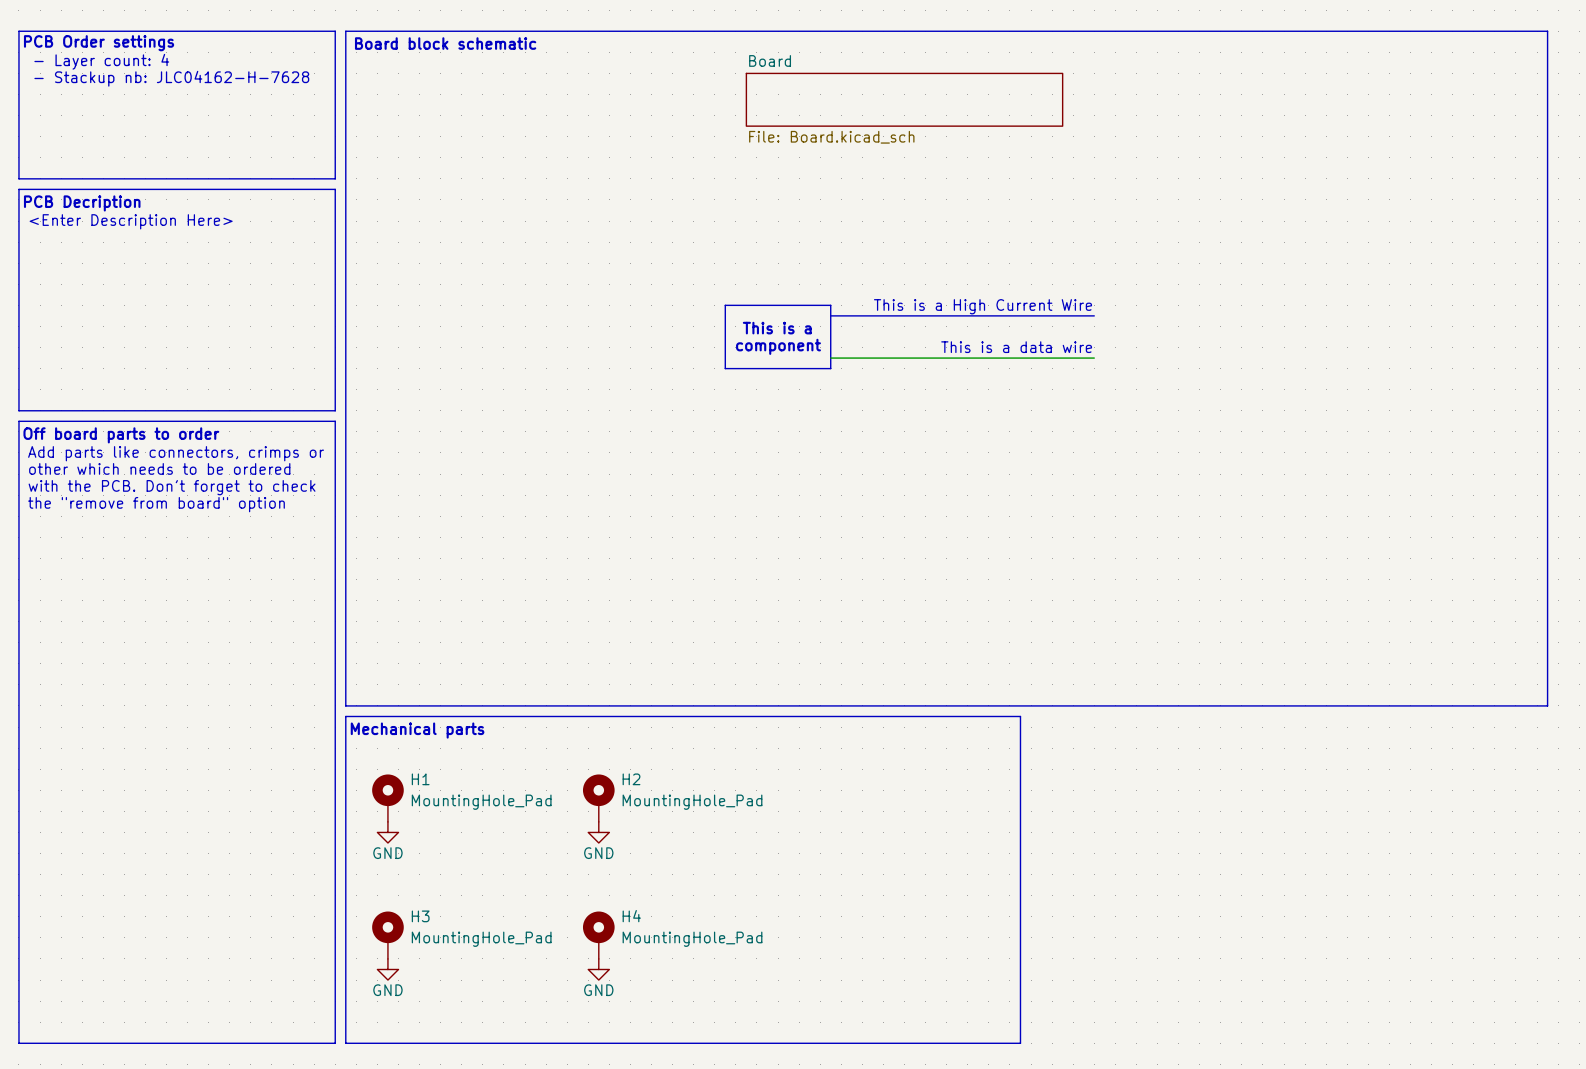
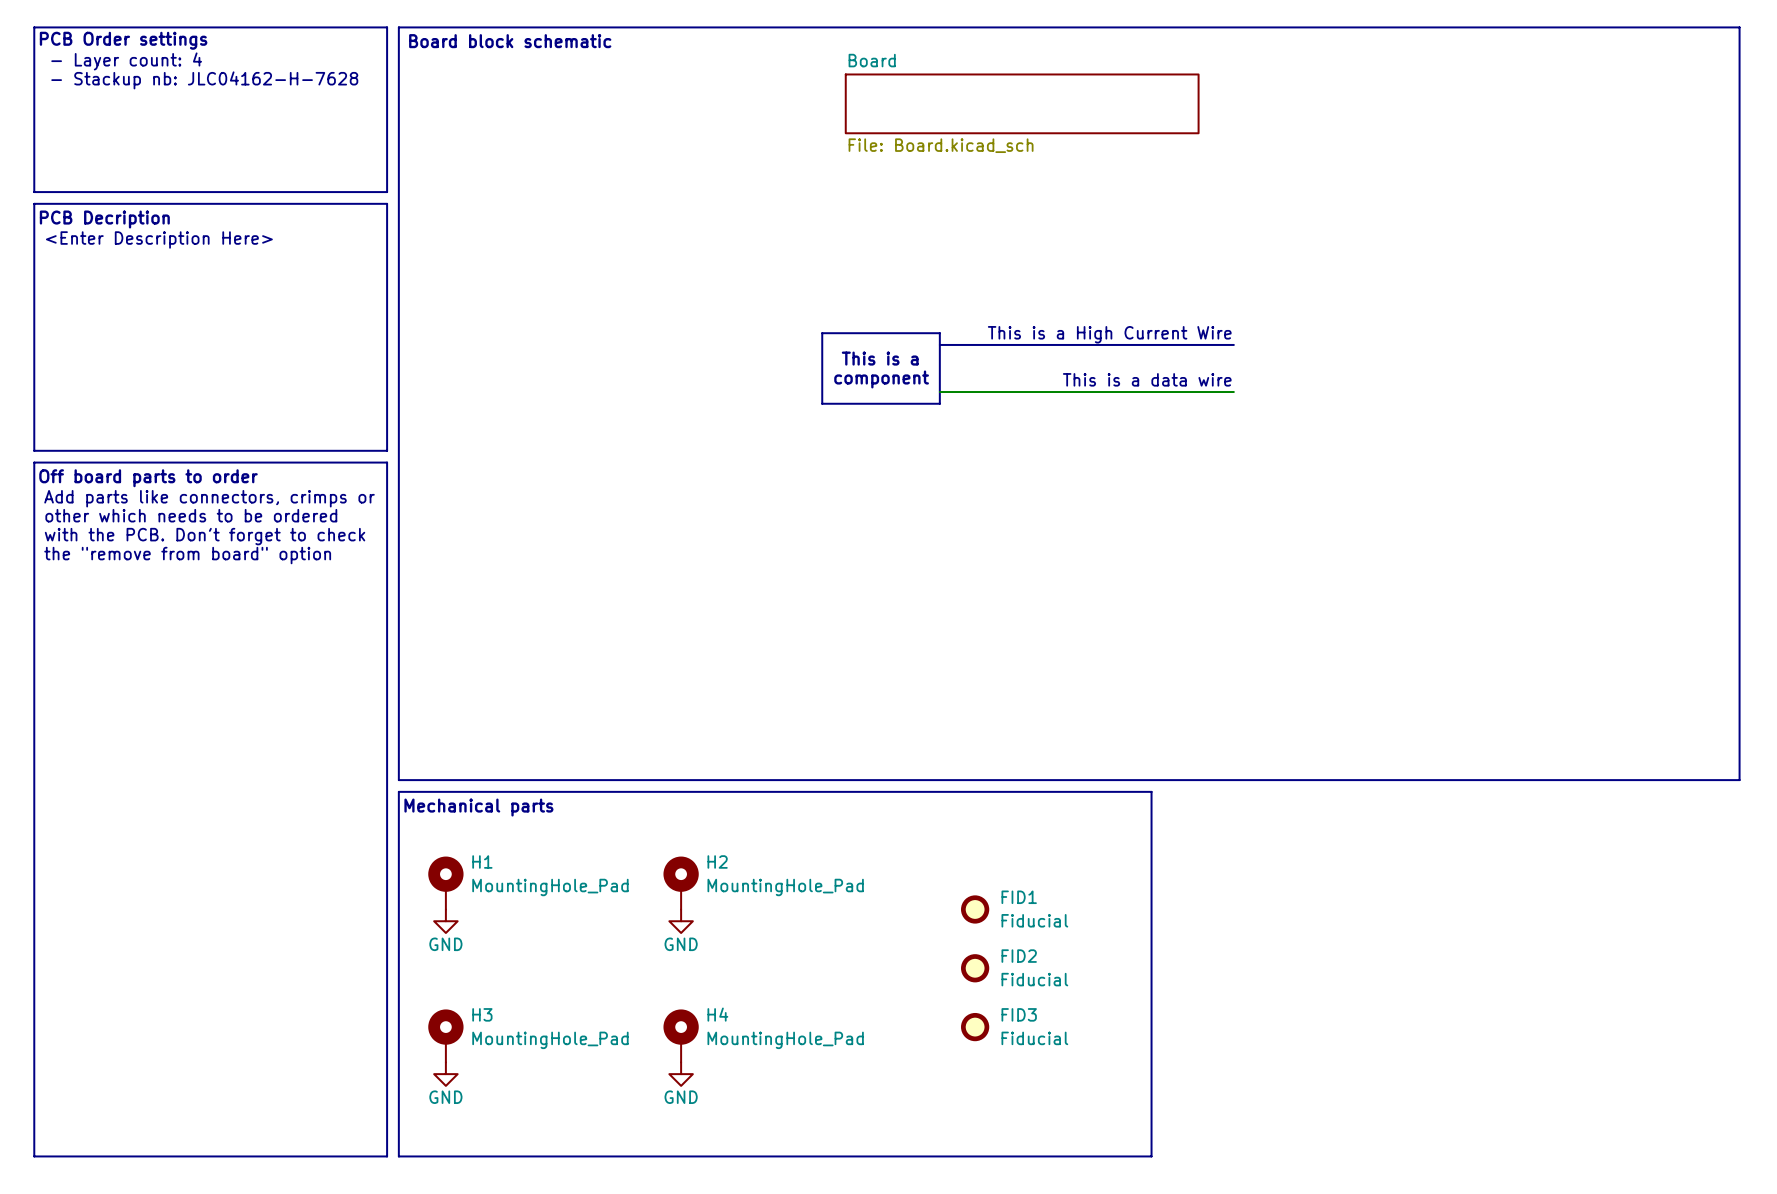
FID1: none -> Fiducial (975, 909)
FID2: none -> Fiducial (975, 968)
FID3: none -> Fiducial (975, 1027)

